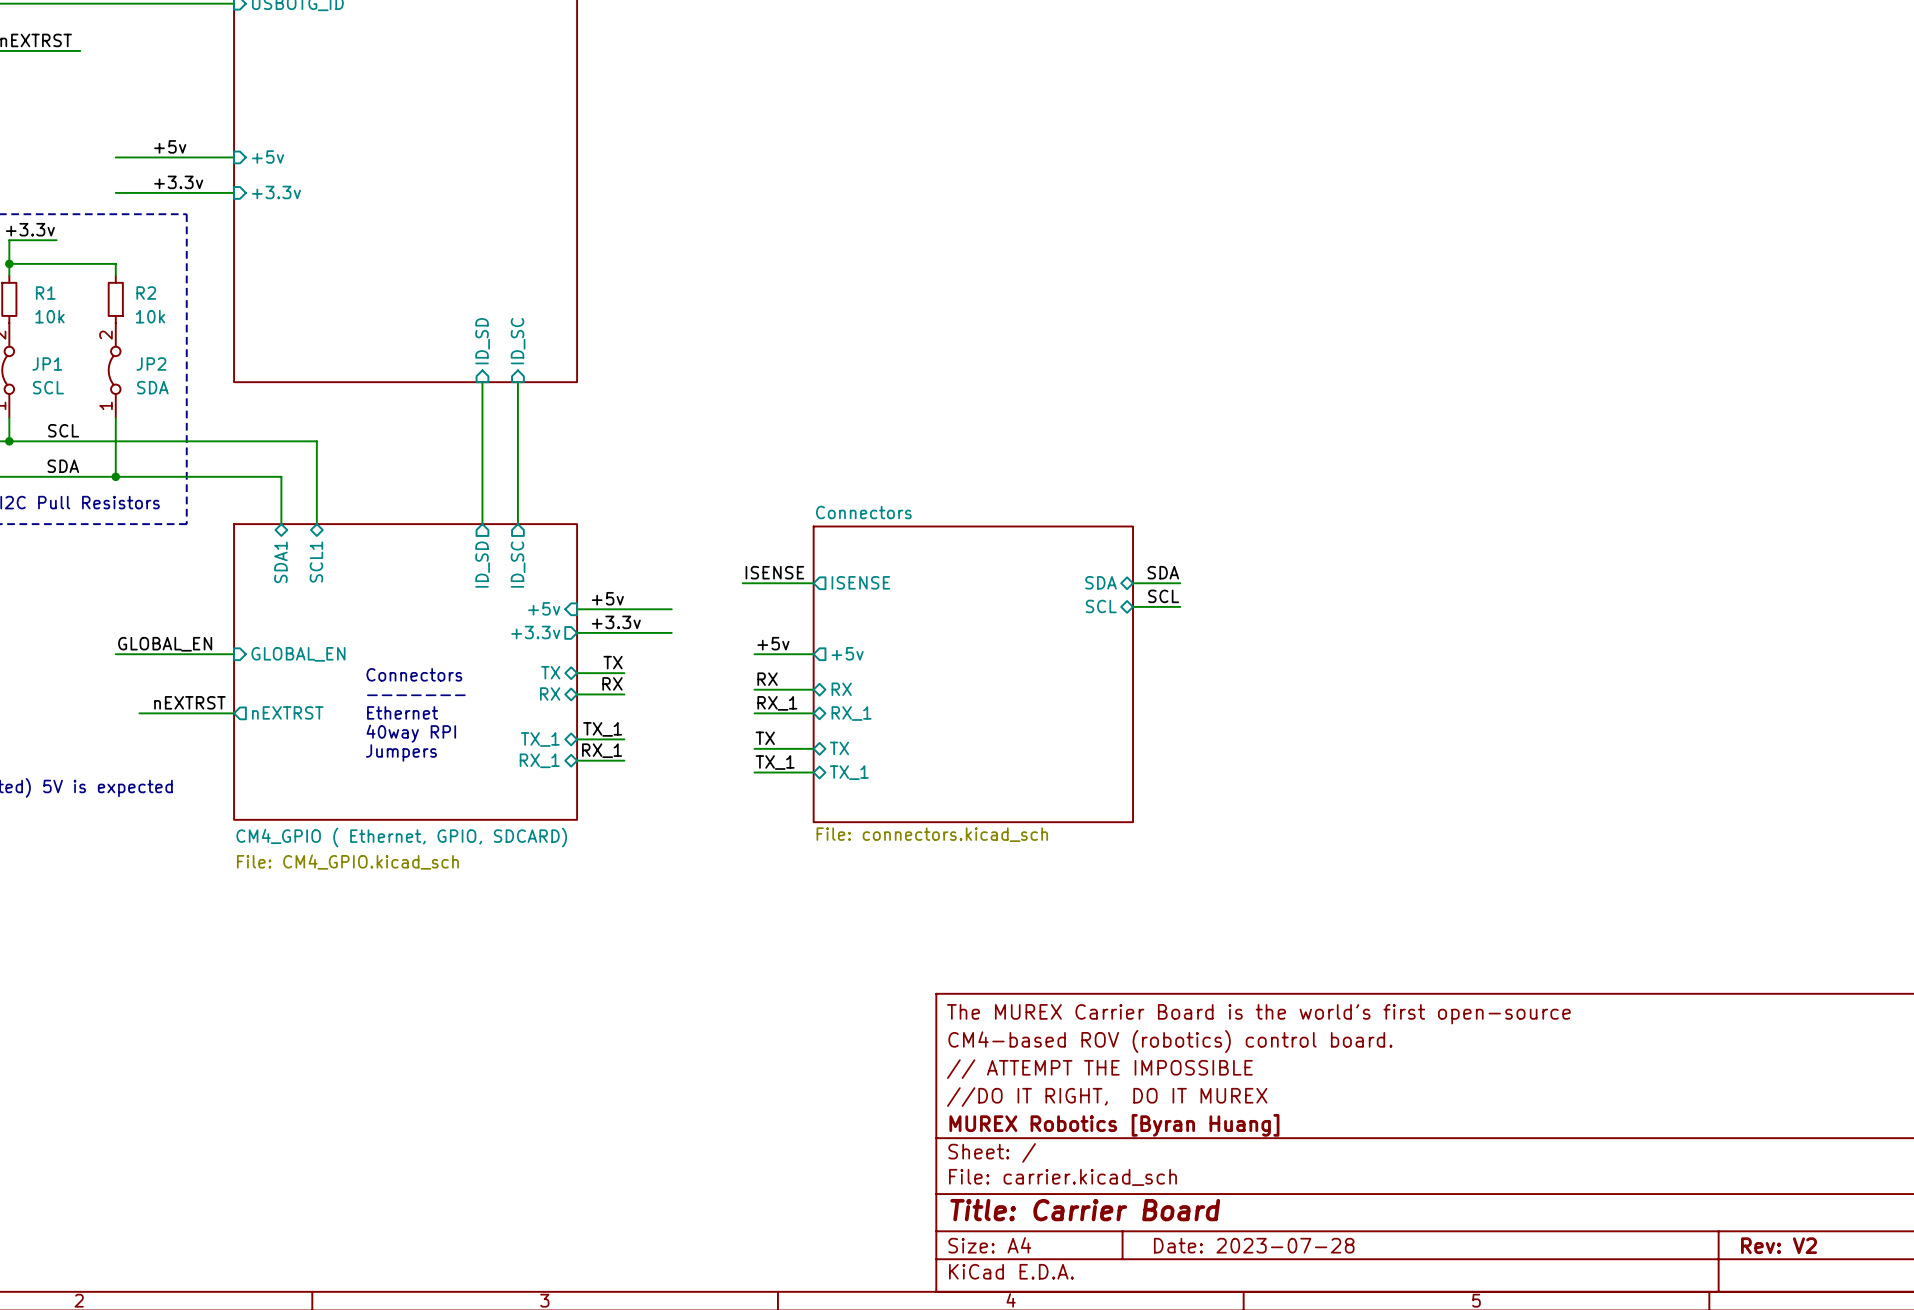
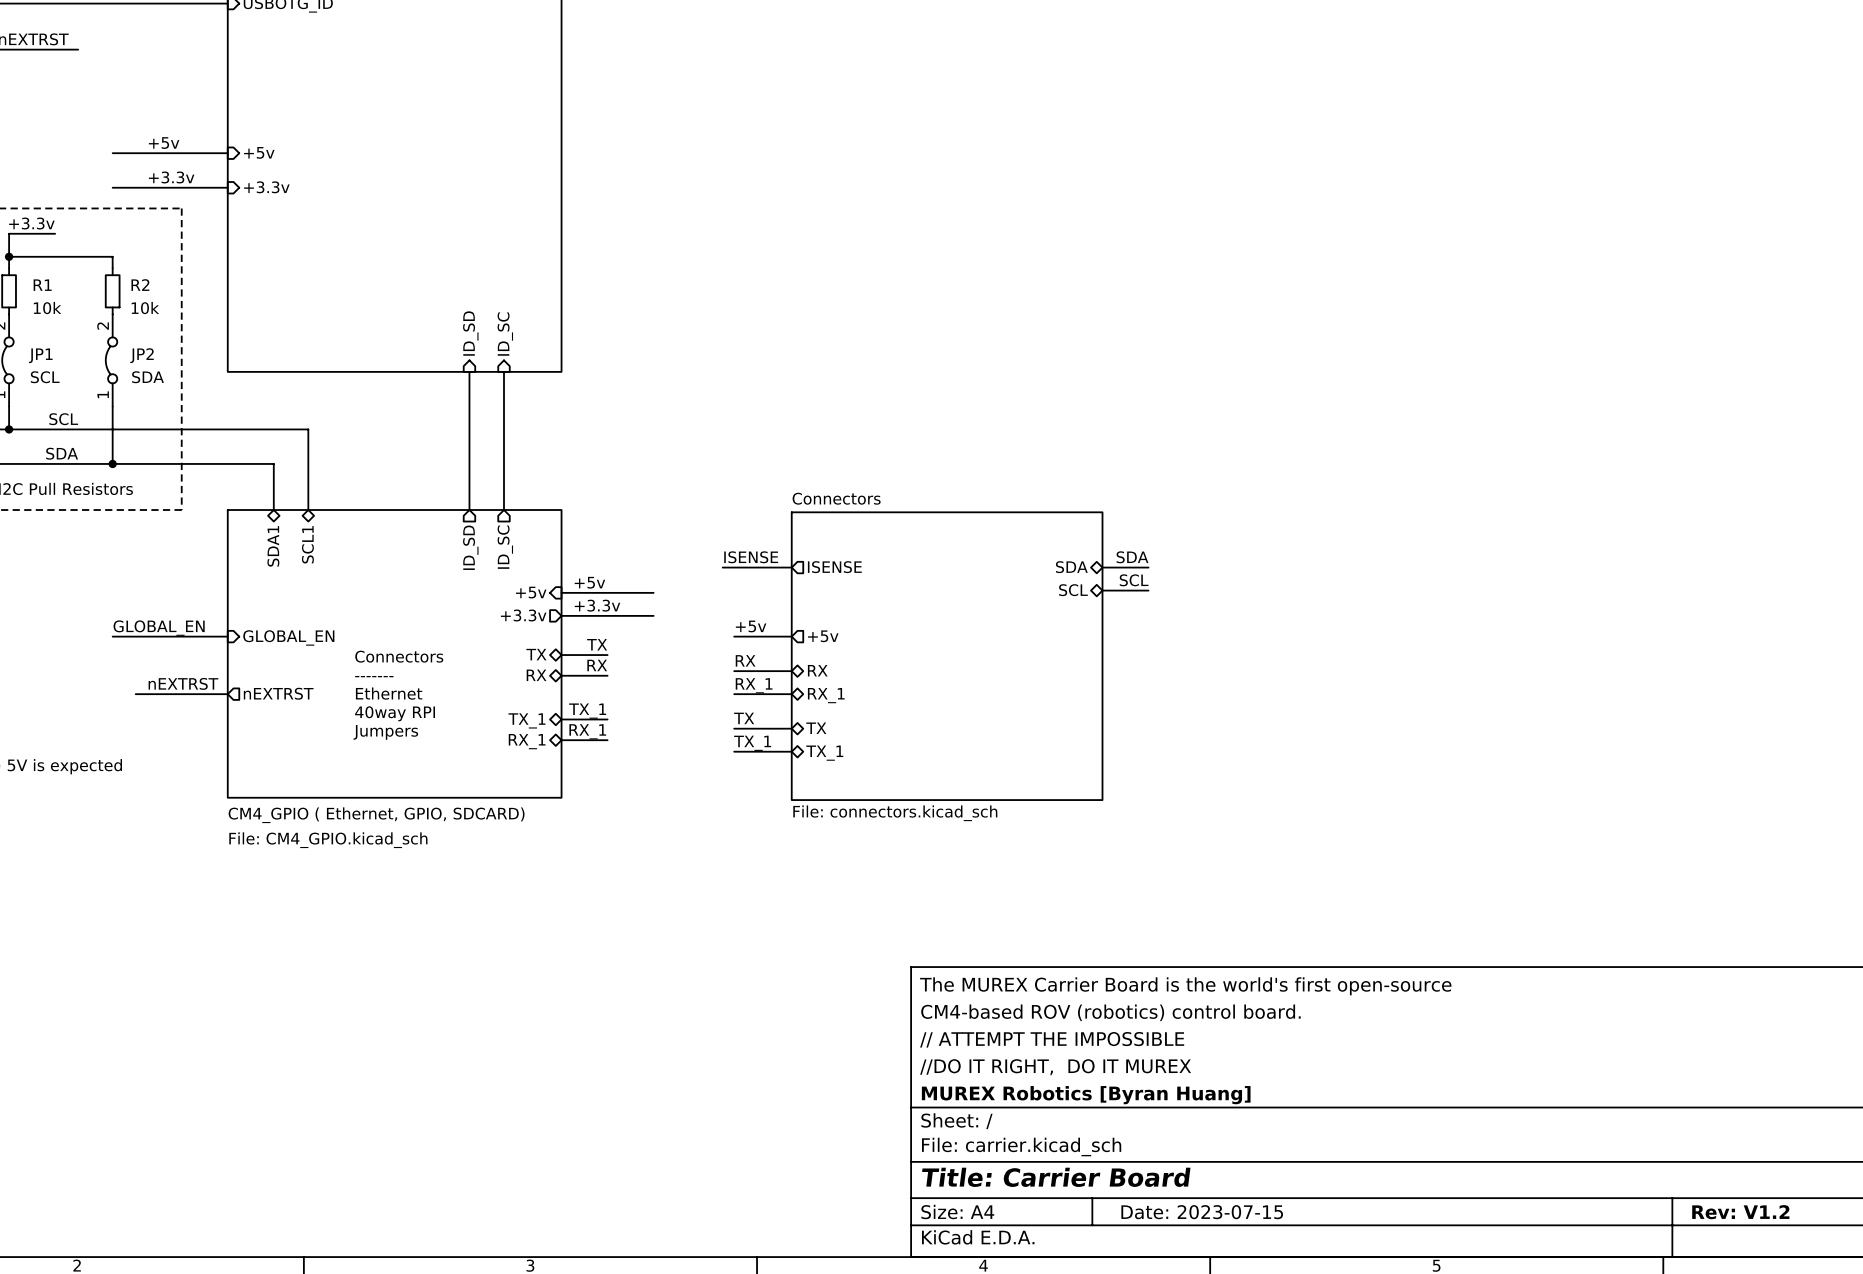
title block: Date: 2023-07-28 (1254, 1245) -> Date: 2023-07-15 (1202, 1212)
title block: Rev: V2 (1779, 1245) -> Rev: V1.2 (1740, 1212)

